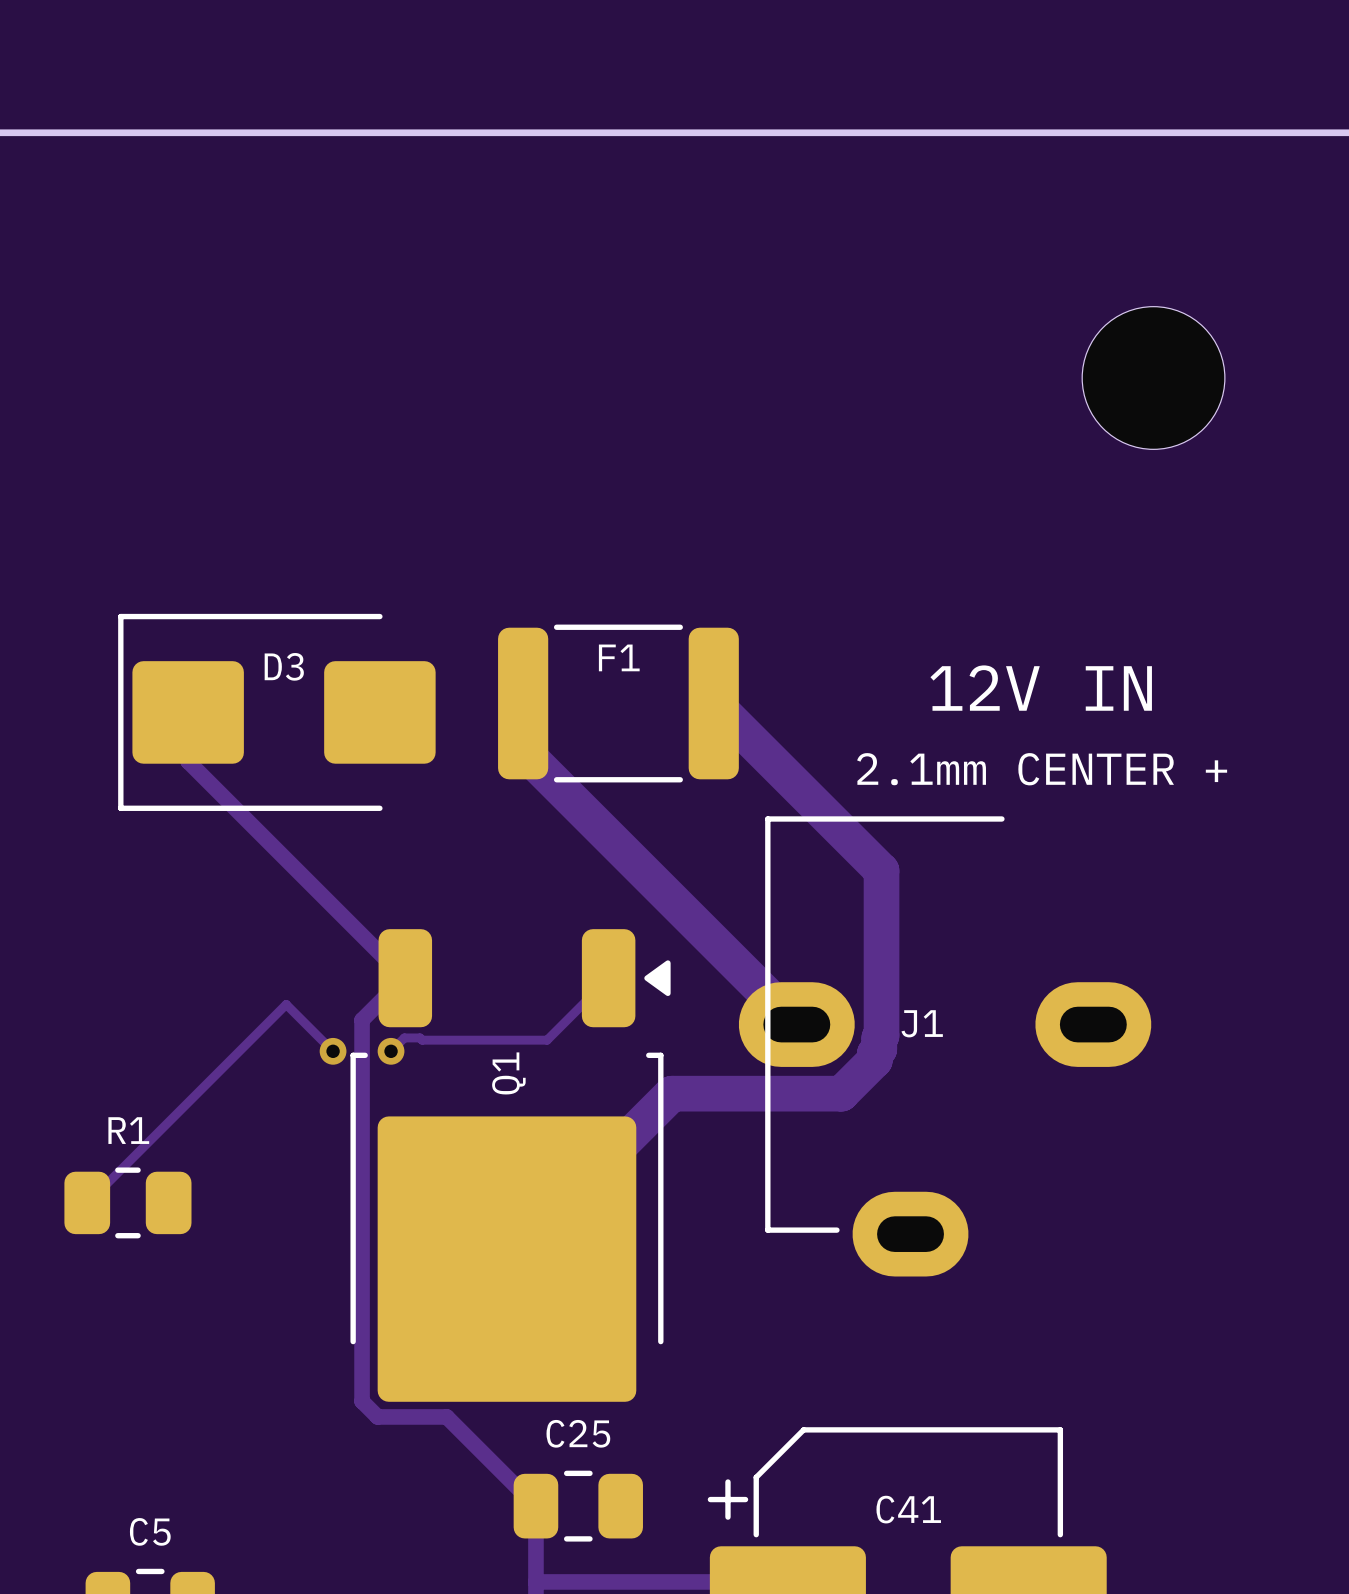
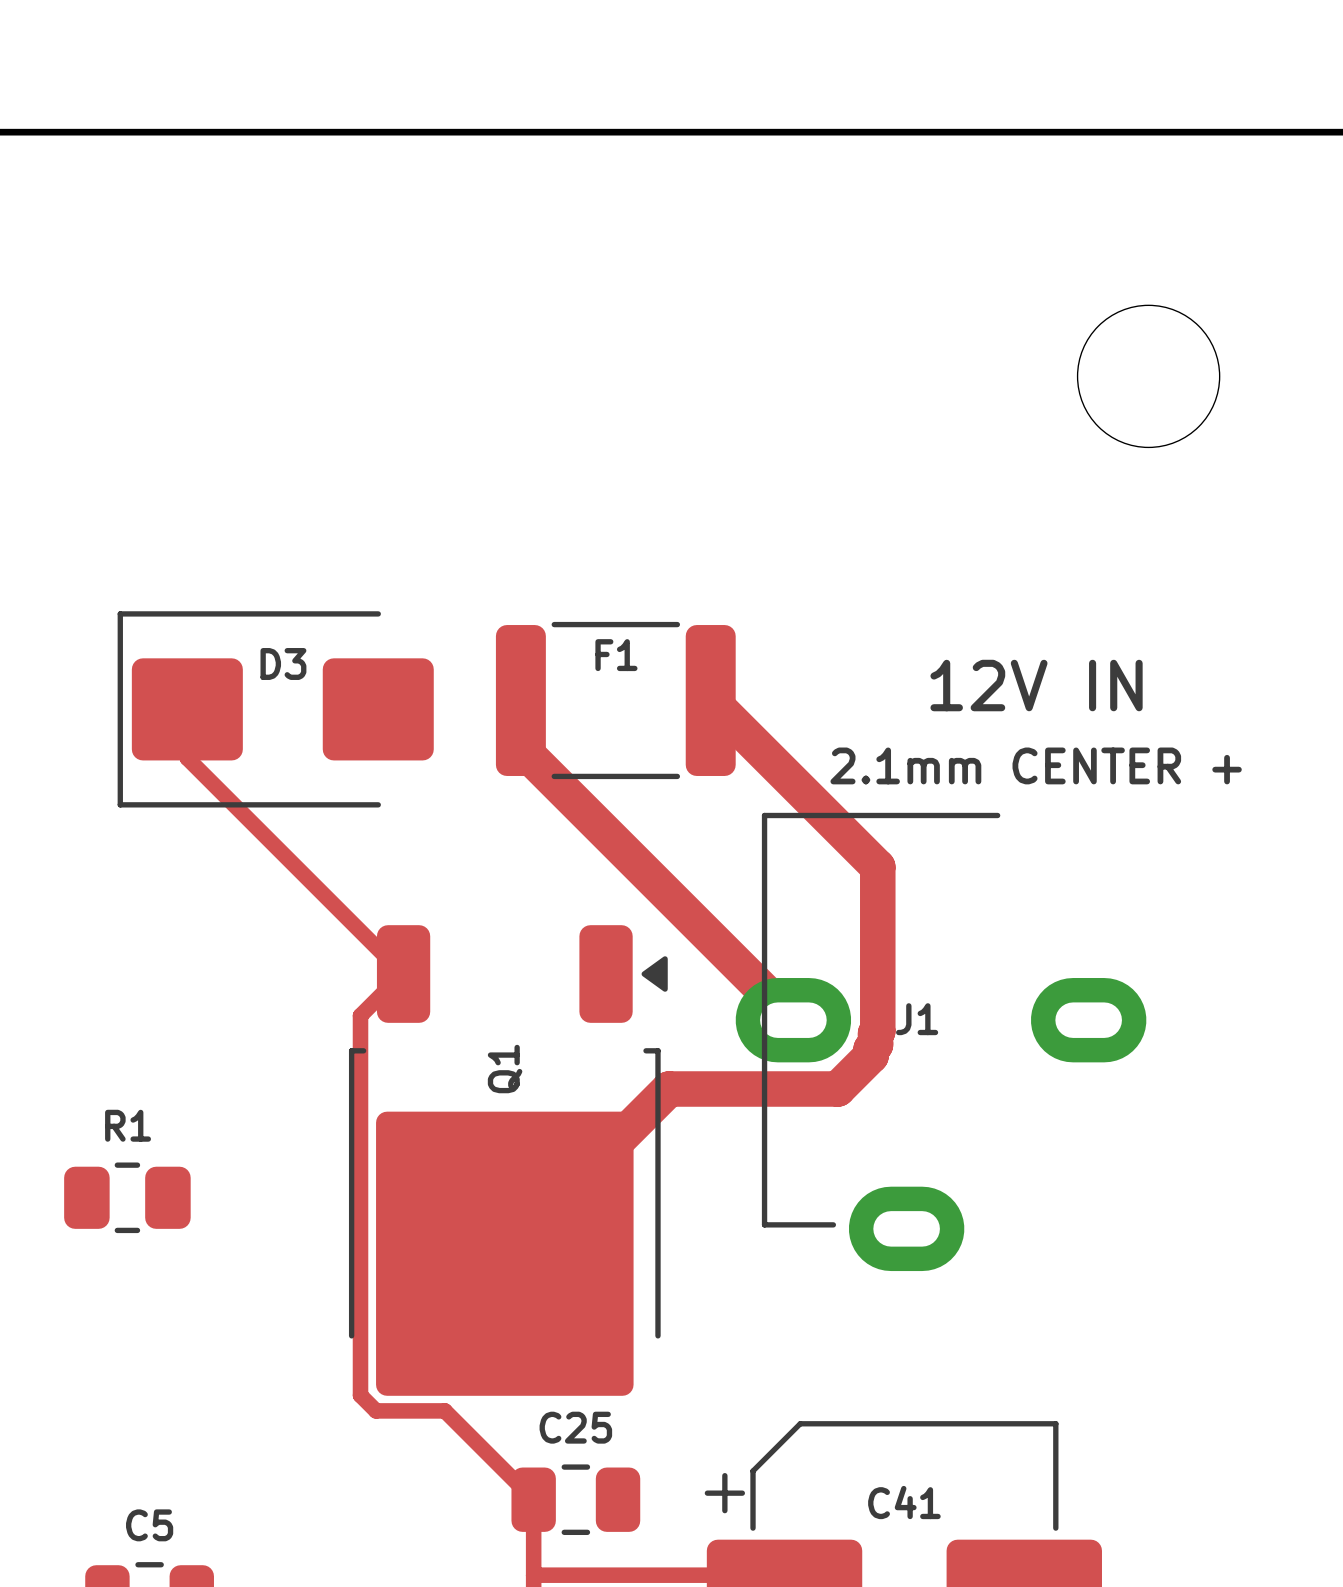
track: (608, 978) (547, 1040) (422, 1040) (420, 1037) (404, 1037) (391, 1051) -> none
track: (333, 1051) (286, 1004) (87, 1202) -> none
via: (333, 1051) -> none
via: (391, 1051) -> none

